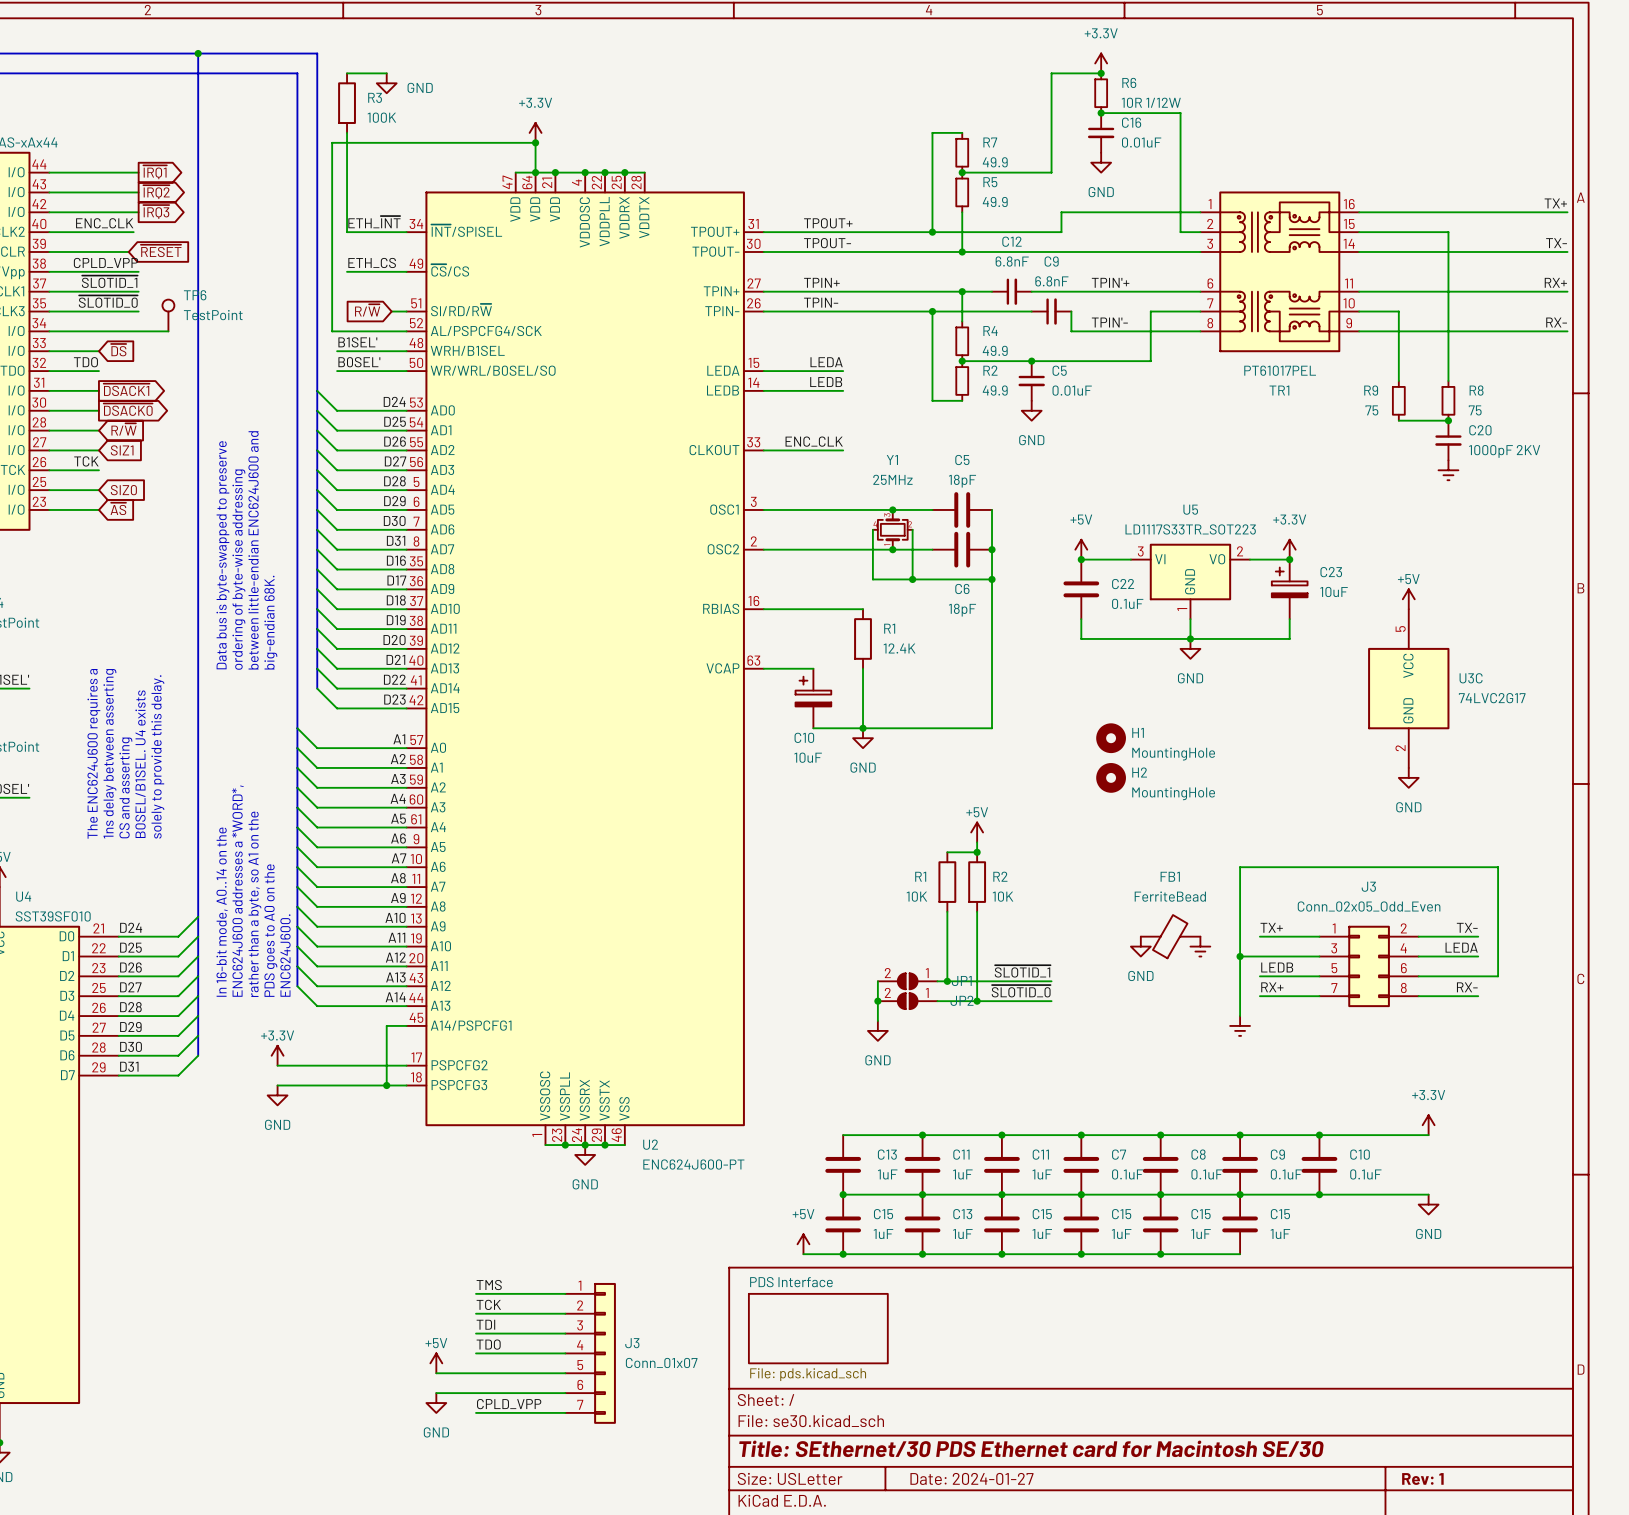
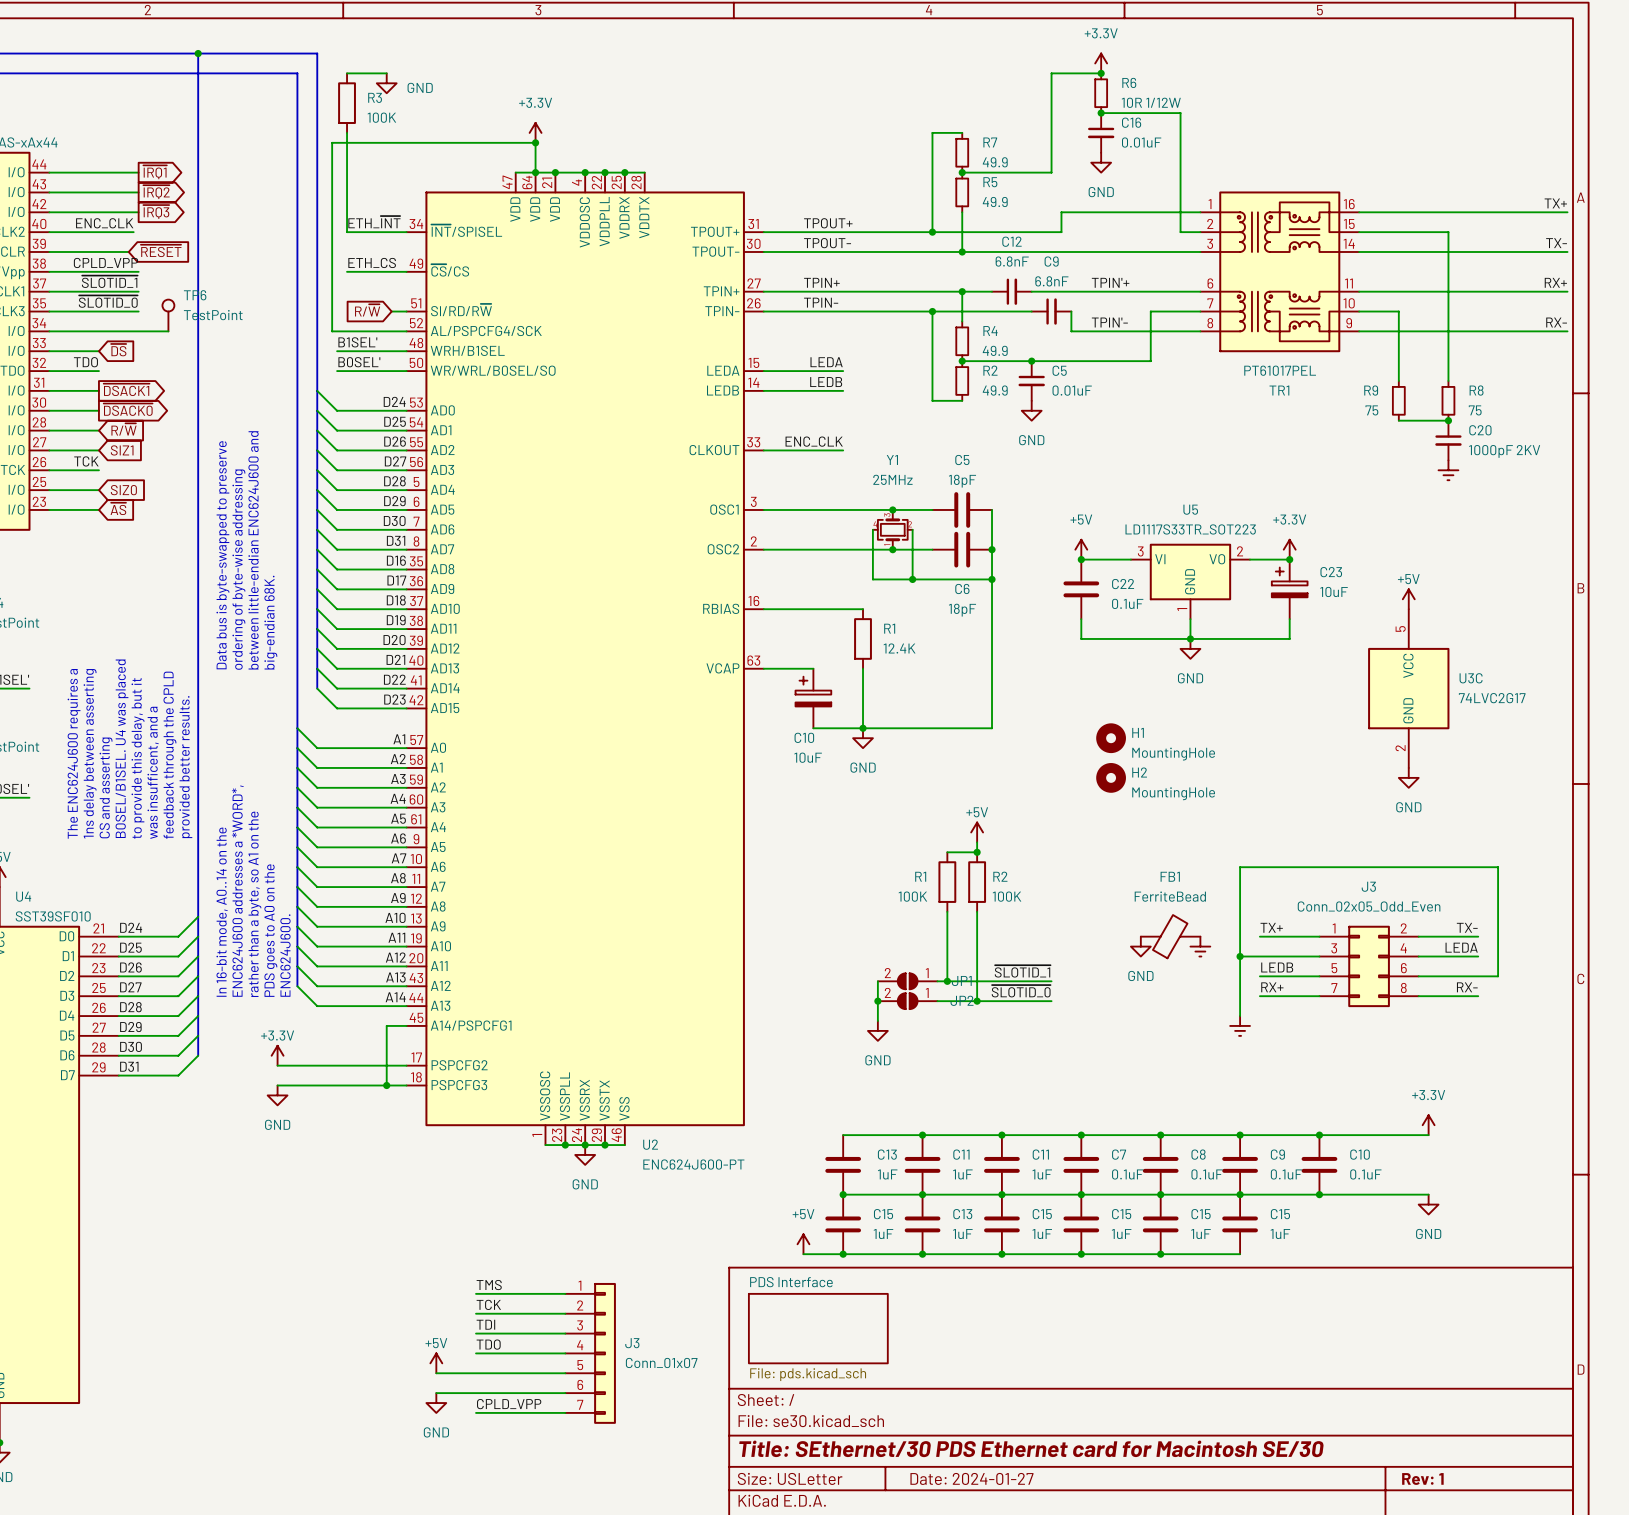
text: none -> The ENC624J600 requires a (74, 753)
text: The ENC624J600 requires a (93, 753) -> 1ns delay between asserting (90, 753)
text: 1ns delay between asserting (109, 753) -> CS and asserting (106, 787)
text: none -> feedback through the CPLD (169, 755)
text: solely to provide this delay. (157, 756) -> was insufficent, and a (153, 772)
text: B0SEL/B1SEL. U4 exists (140, 764) -> to provide this delay, but it (137, 758)
text: none -> provided better results. (185, 767)
text: CS and asserting (125, 787) -> B0SEL/B1SEL. U4 was placed (121, 748)
R1 value: 10K (916, 896) -> 100K (912, 896)
R2 value: 10K (1003, 896) -> 100K (1007, 896)

